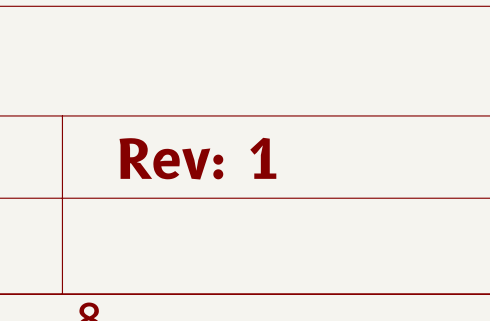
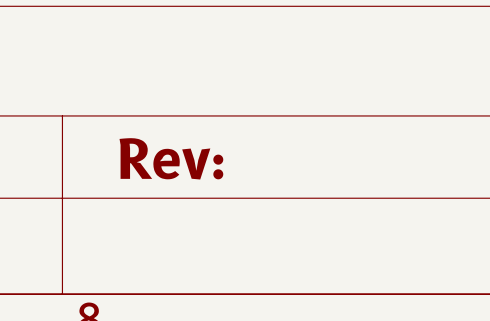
title block: Rev: 1 (197, 158) -> Rev: (171, 158)

